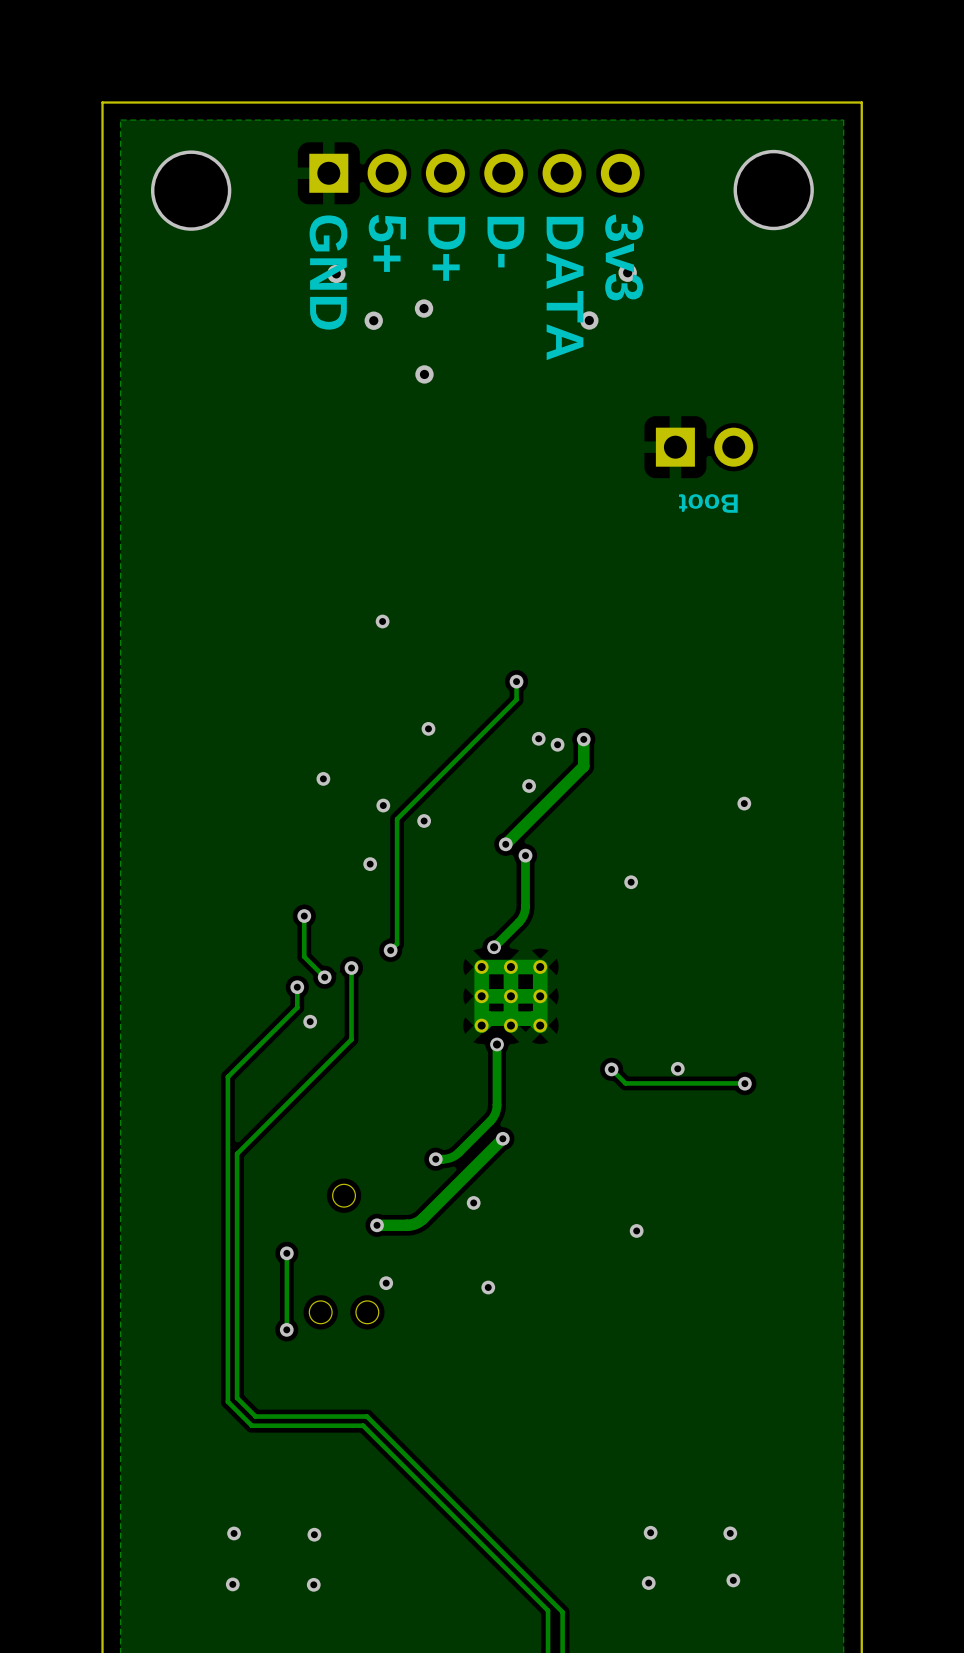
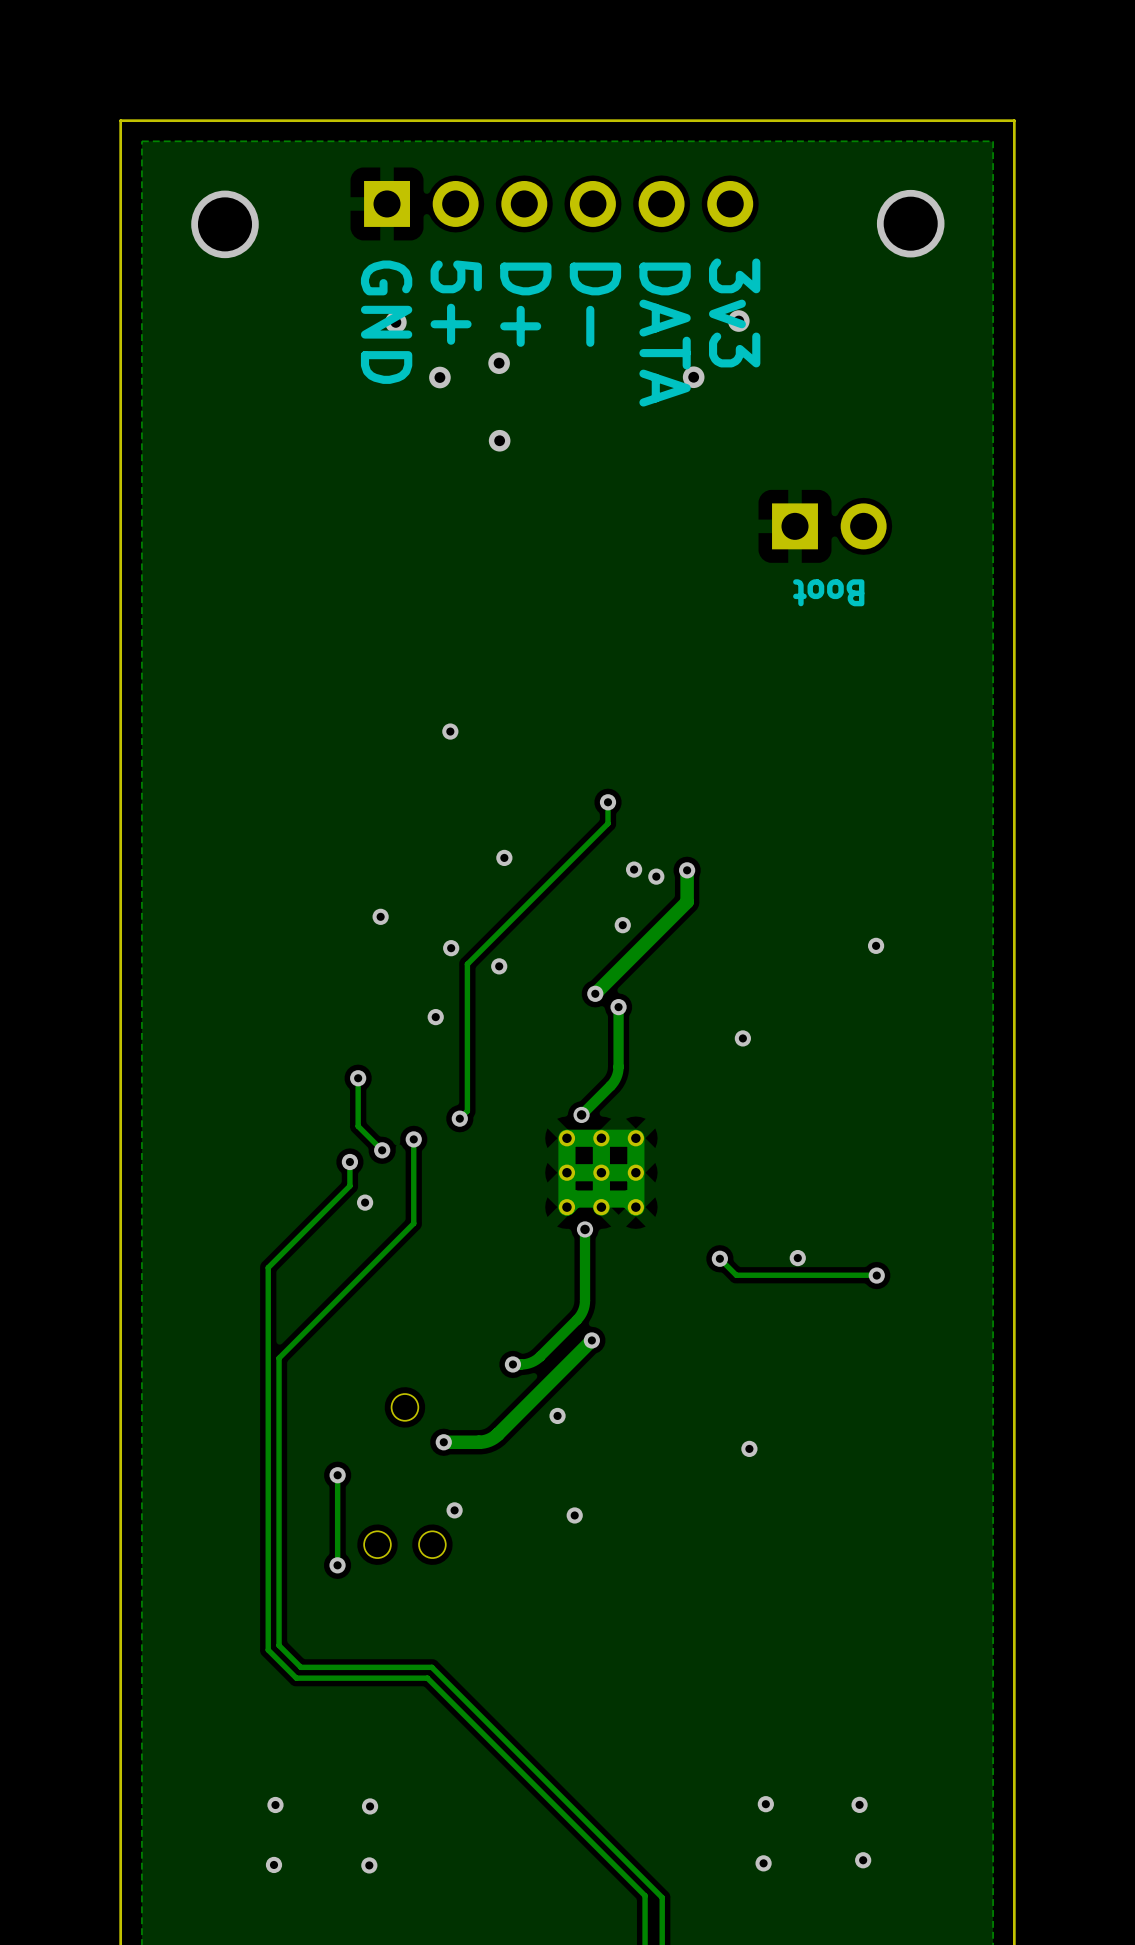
via size: [733, 149, 814, 231] -> [876, 189, 945, 258]
via size: [150, 150, 232, 231] -> [191, 190, 259, 259]

